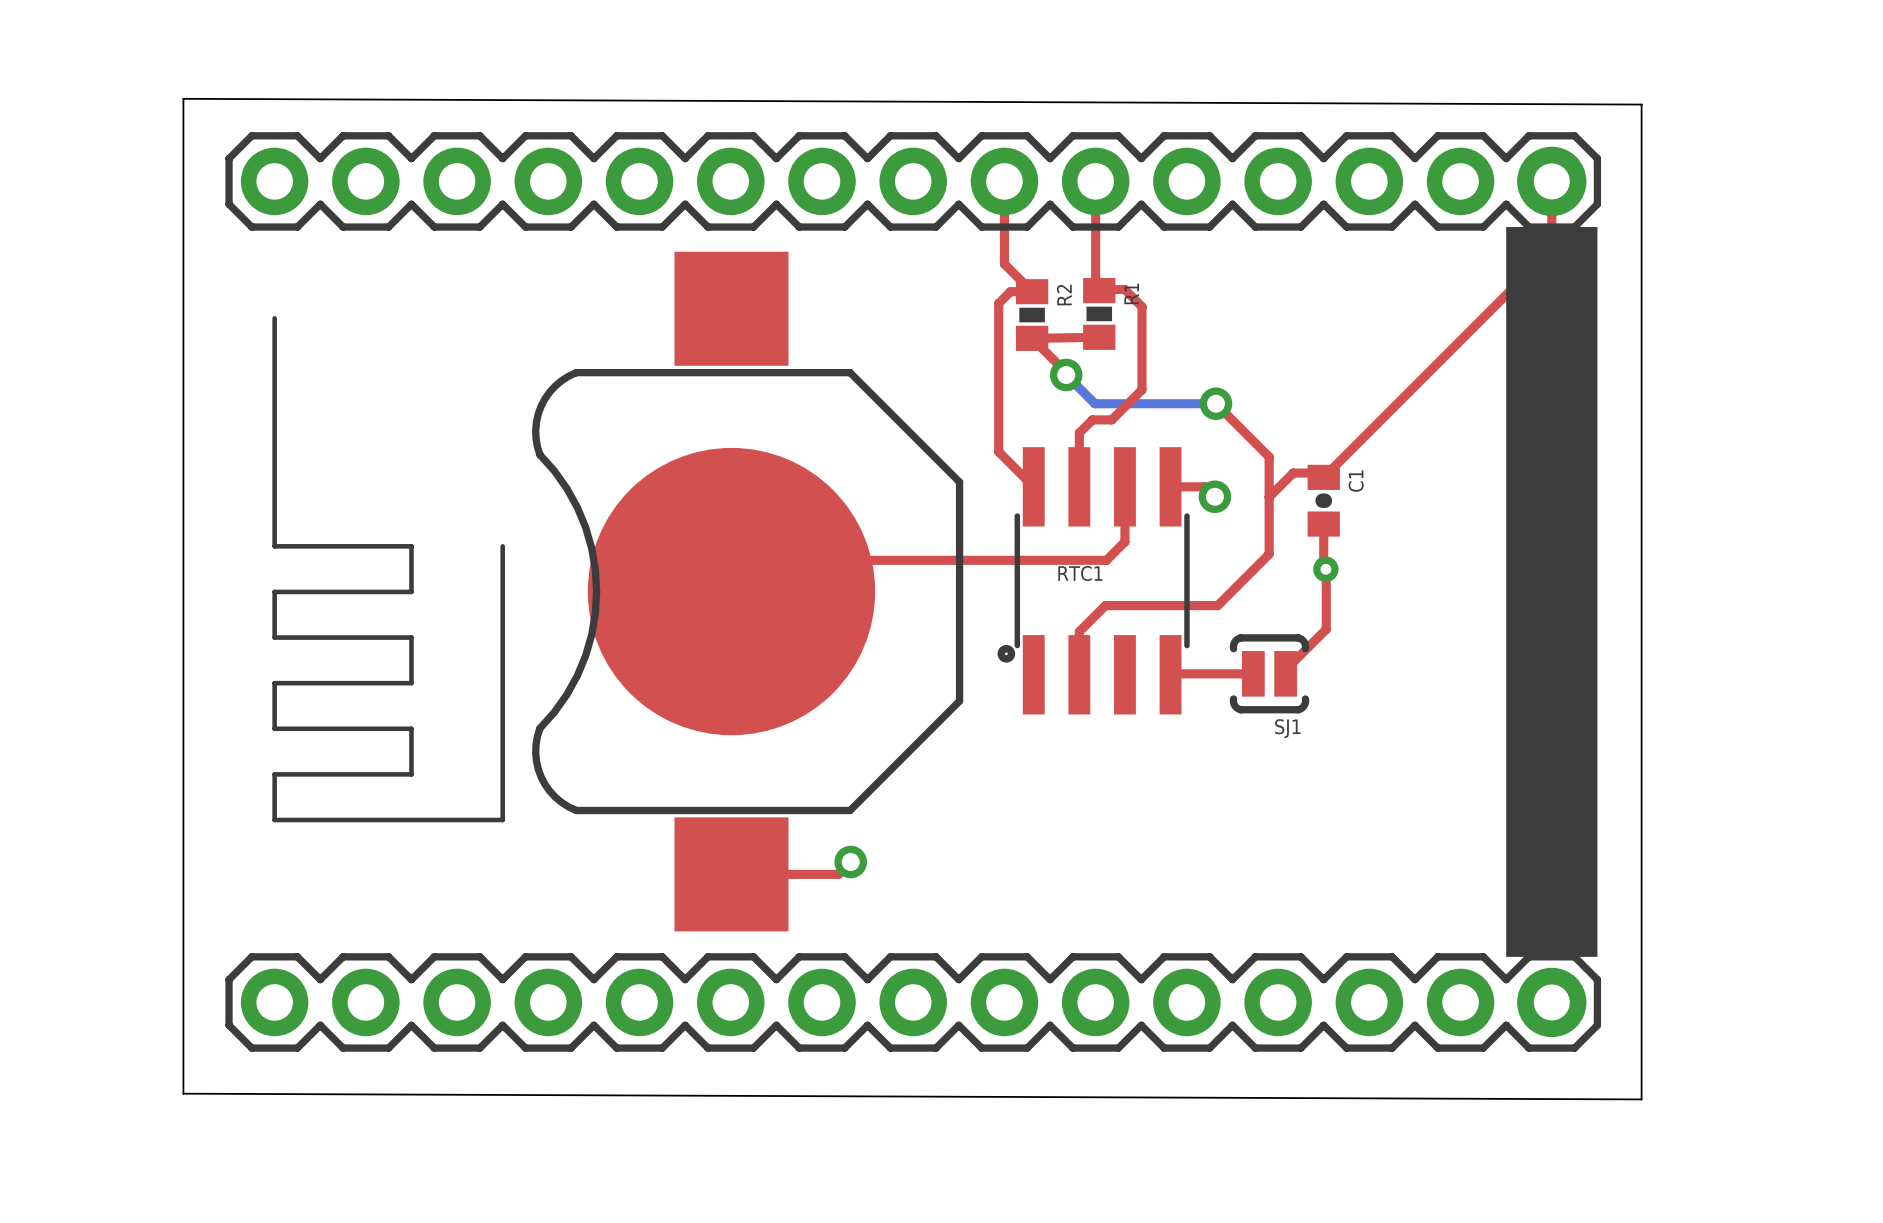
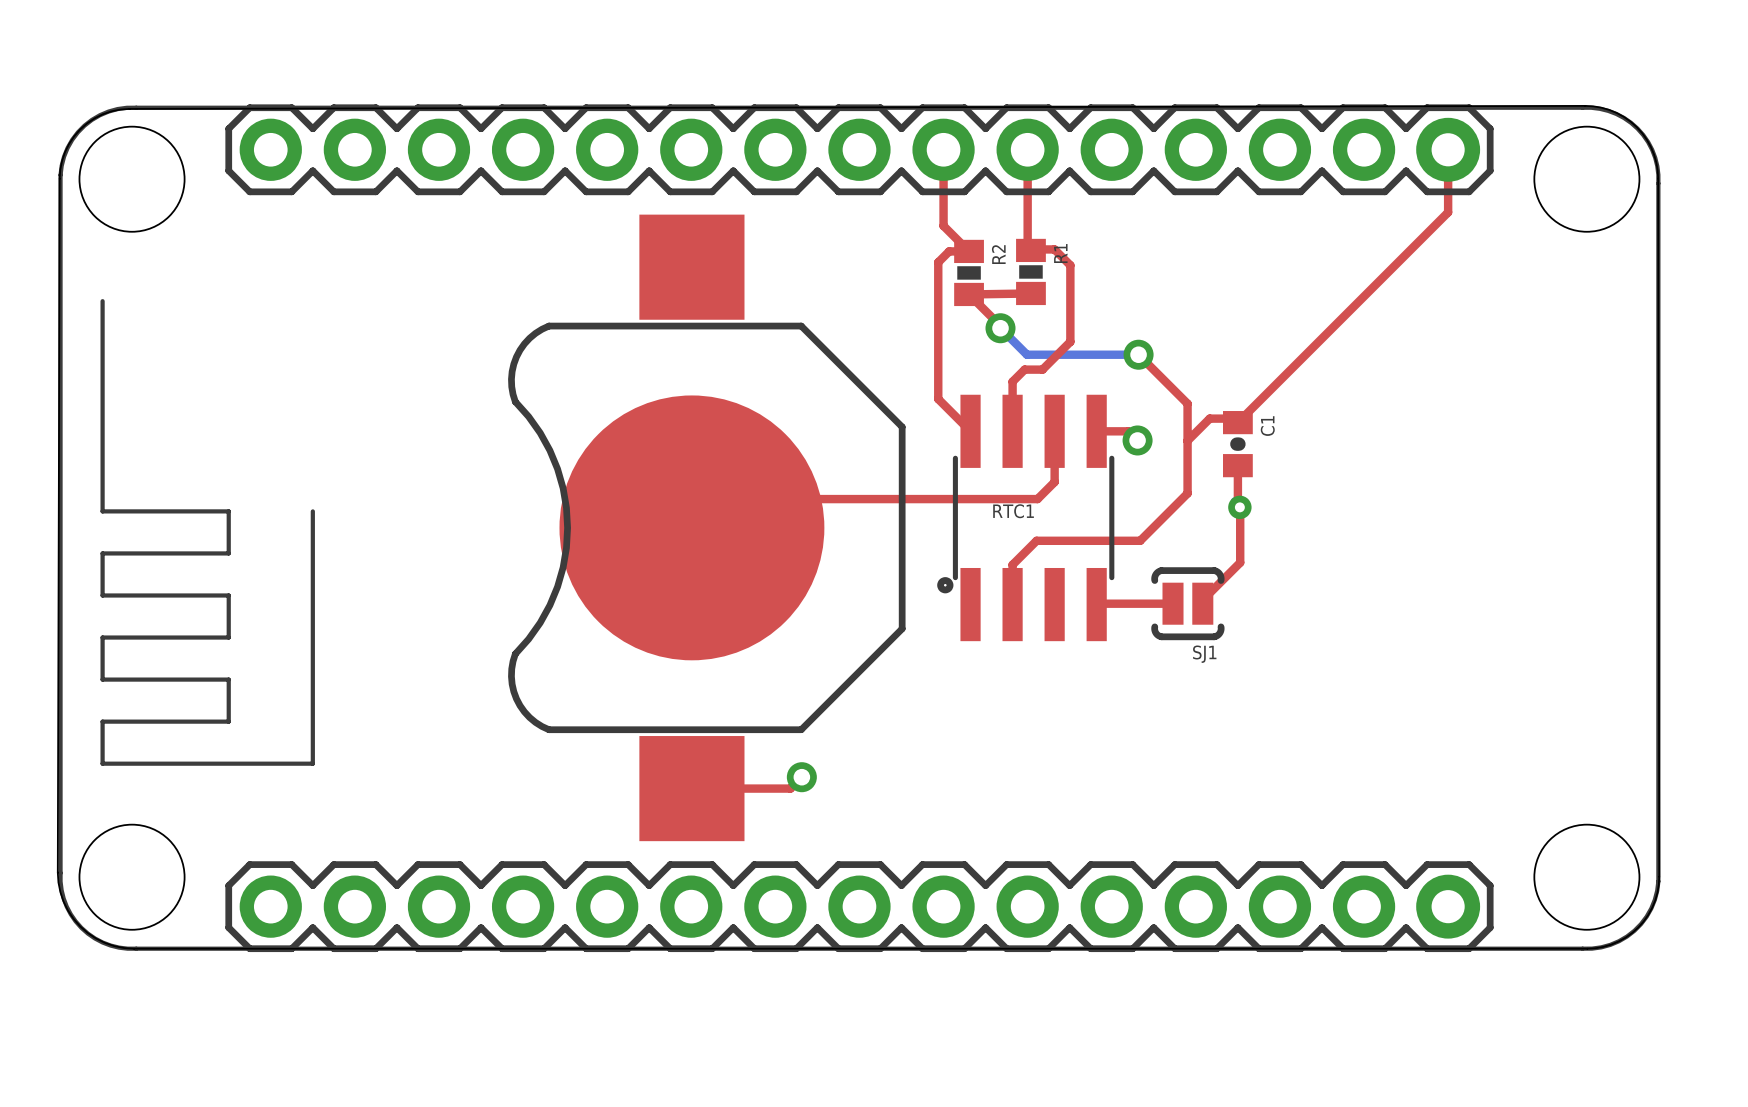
board edge: (183, 98) (1641, 104) (1641, 1099) (183, 1093) (183, 98) -> (1585, 105) (129, 108) (111, 111) (94, 118) (80, 129) (69, 143) (62, 160) (59, 178) (57, 872) (60, 892) (68, 910) (80, 926) (95, 938) (114, 946) (134, 948) (1587, 948) (1603, 946) (1618, 941) (1632, 932) (1648, 914) (1655, 900) (1659, 876) (1658, 178) (1656, 162) (1650, 147) (1636, 127) (1623, 116) (1609, 109) (1585, 105)
part footprint: [225, 132, 1602, 1052] -> [58, 104, 1661, 953]

